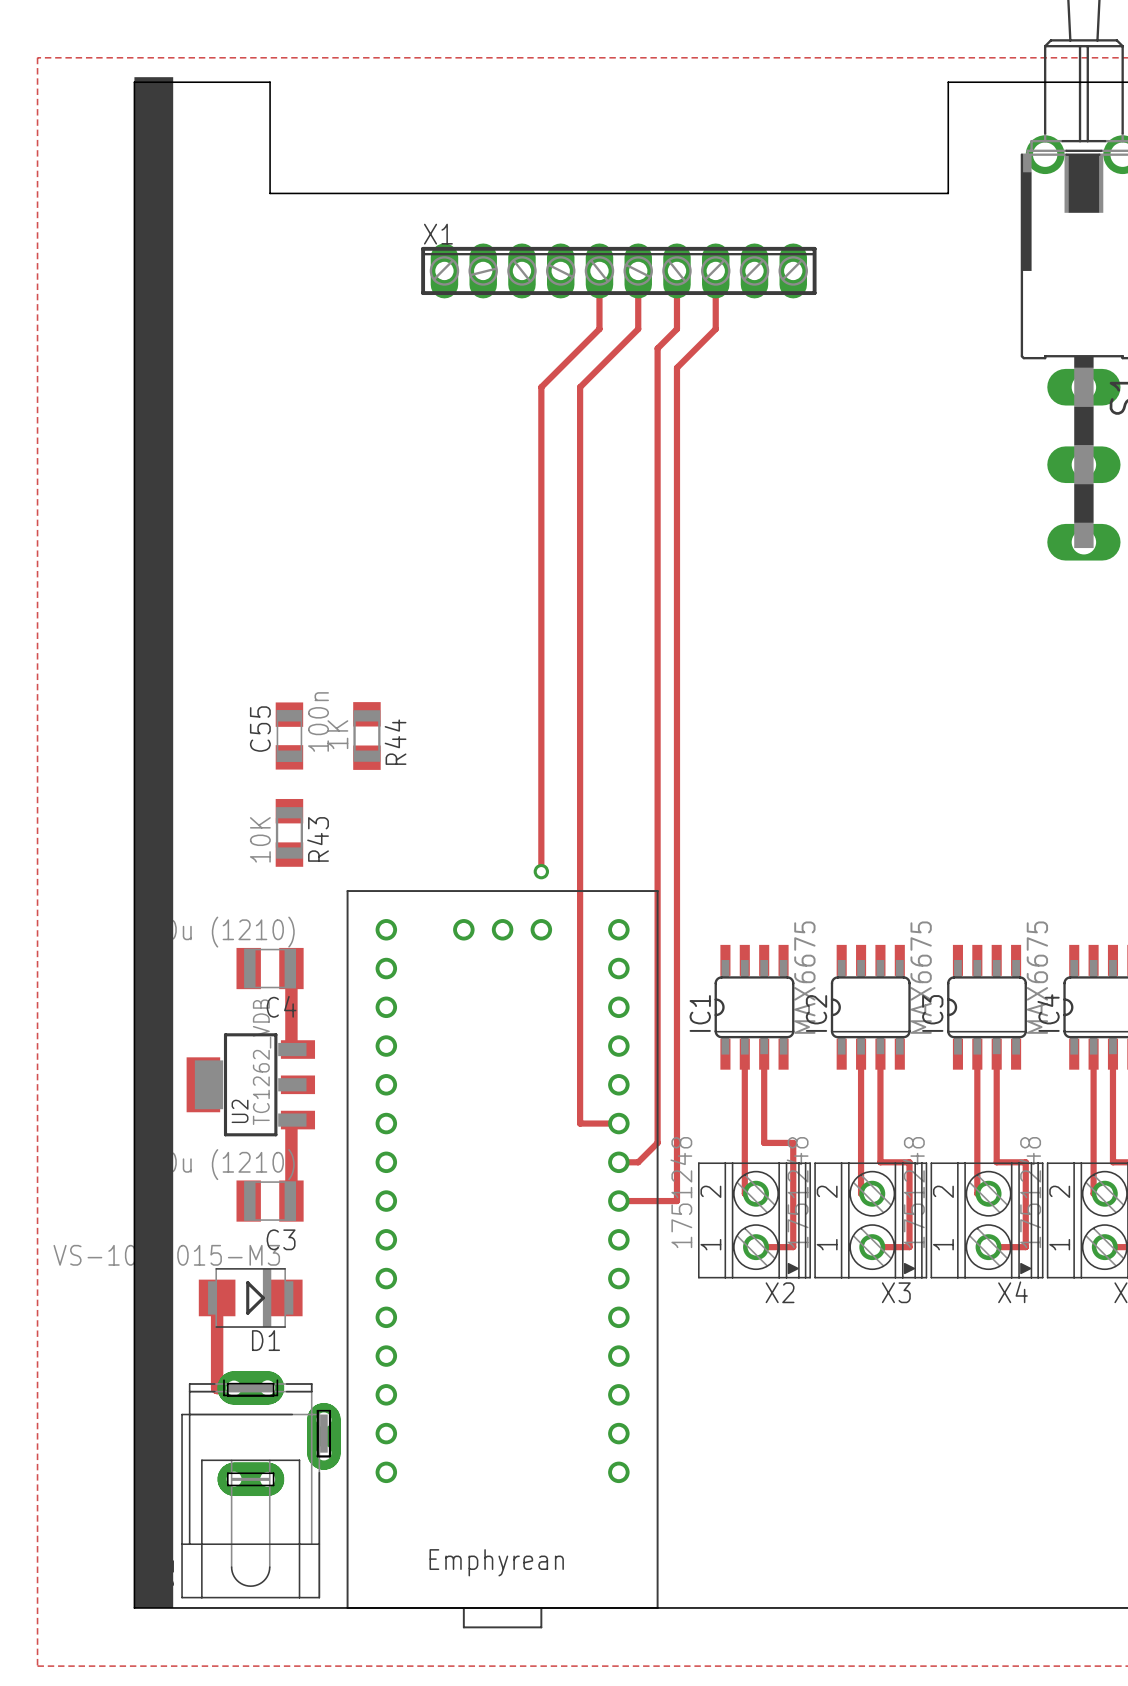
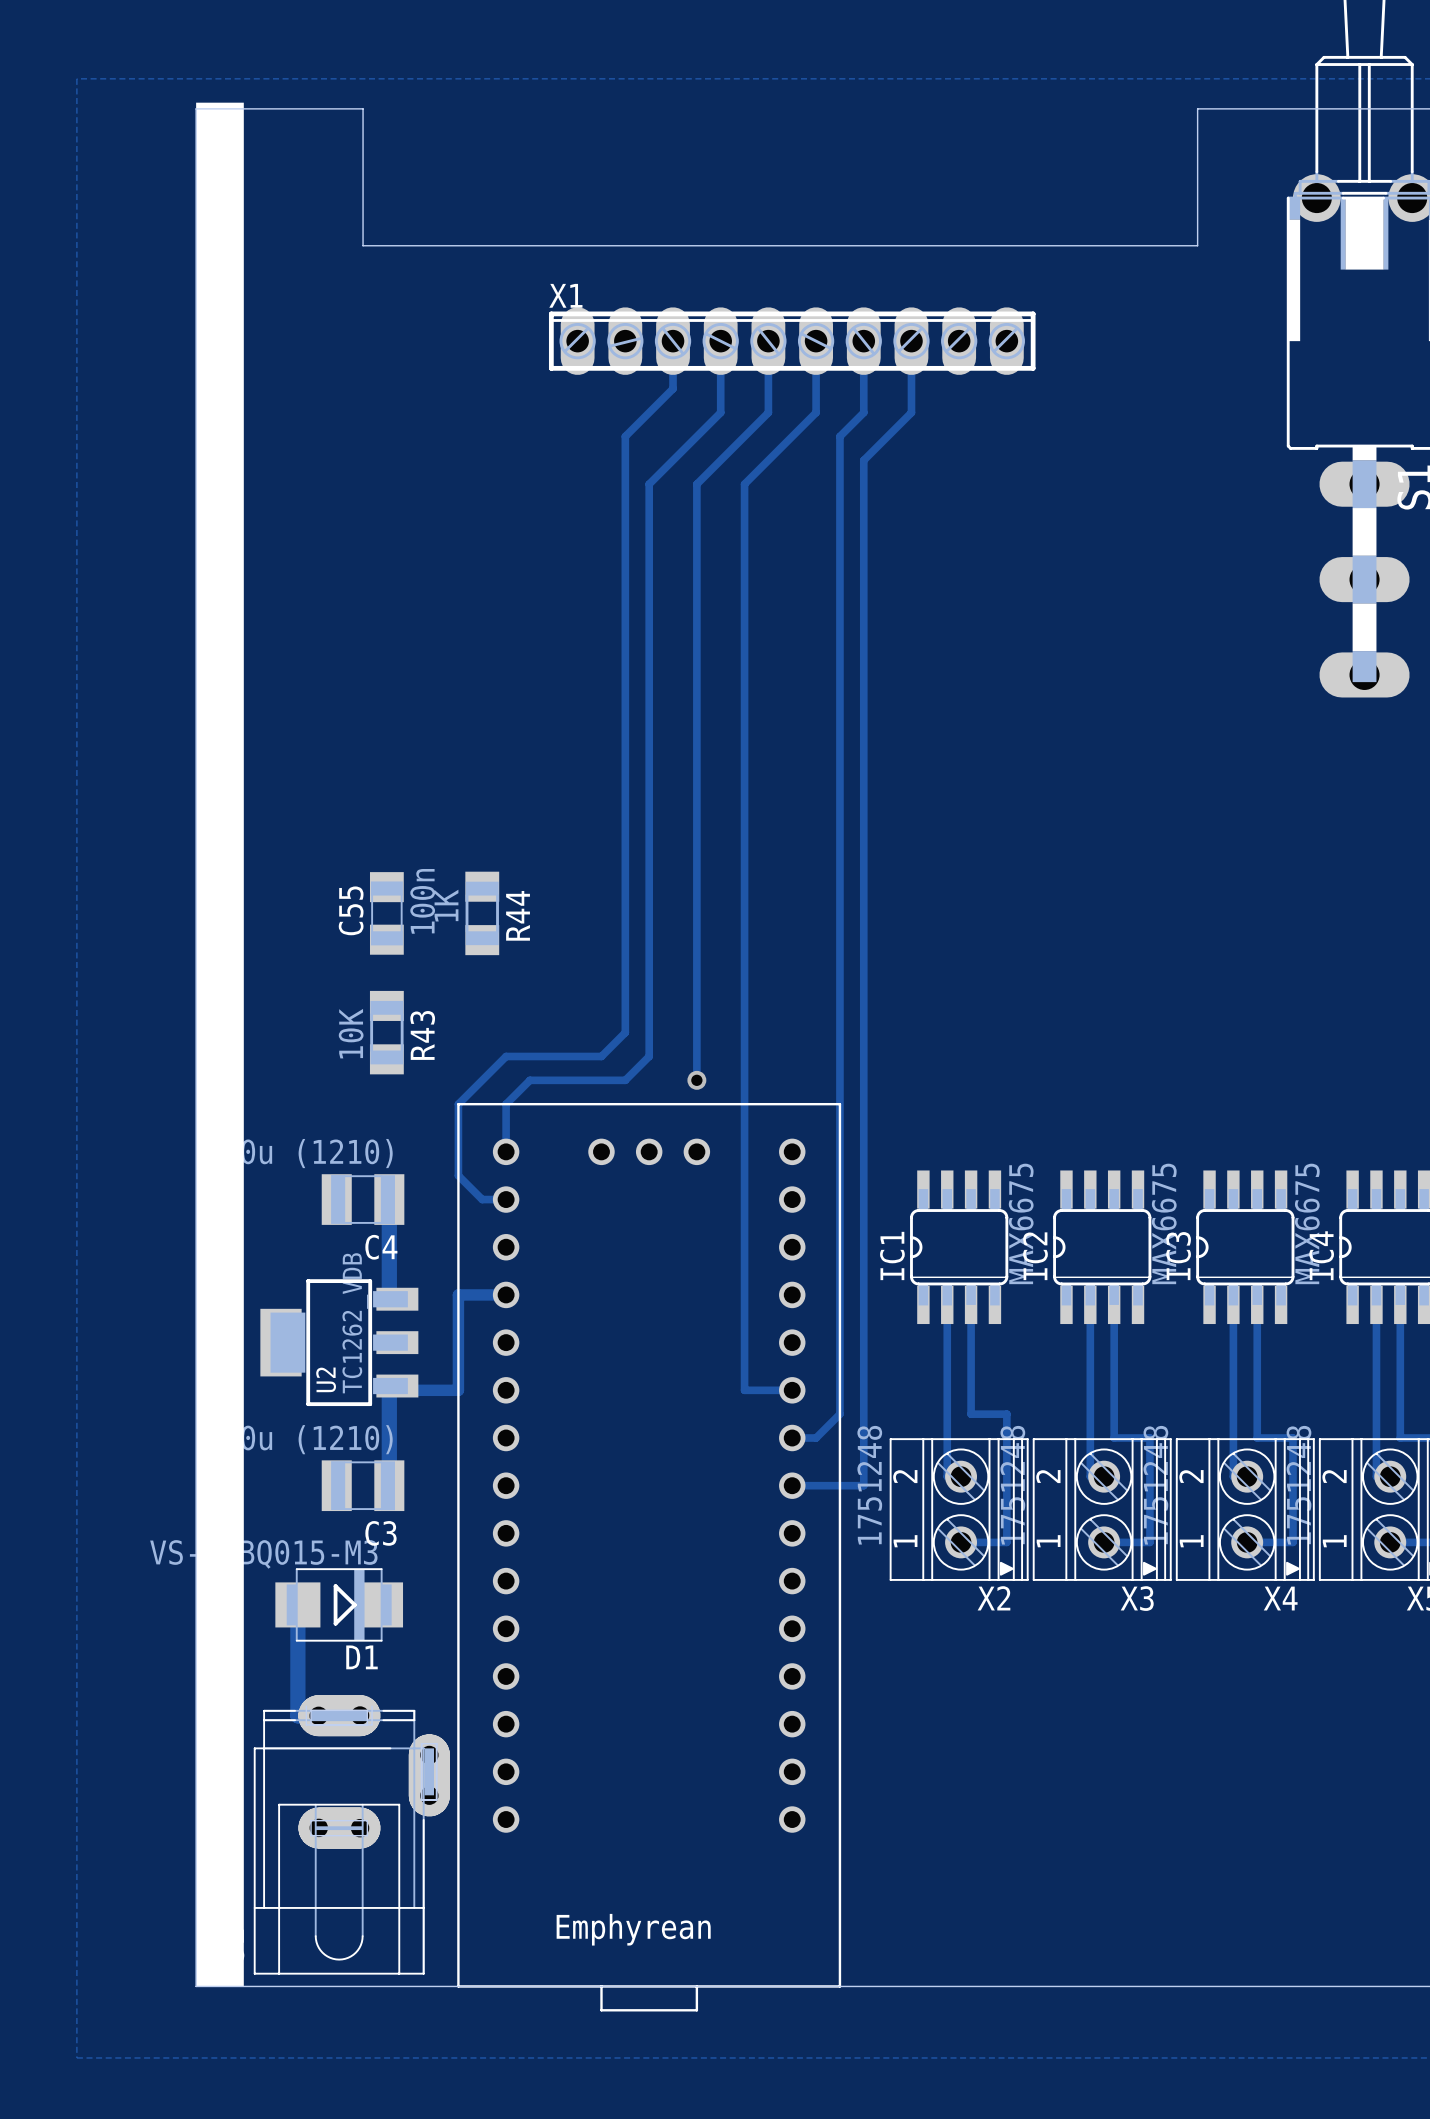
track: none -> (673, 341) (673, 388) (625, 436) (625, 1032) (601, 1056) (506, 1056) (458, 1104) (458, 1175) (482, 1199) (506, 1199)
track: none -> (720, 341) (720, 412) (649, 484) (649, 1056) (625, 1080) (529, 1080) (506, 1104) (506, 1151)
track: none -> (506, 1294) (458, 1294) (458, 1390) (397, 1390) (397, 1386)

